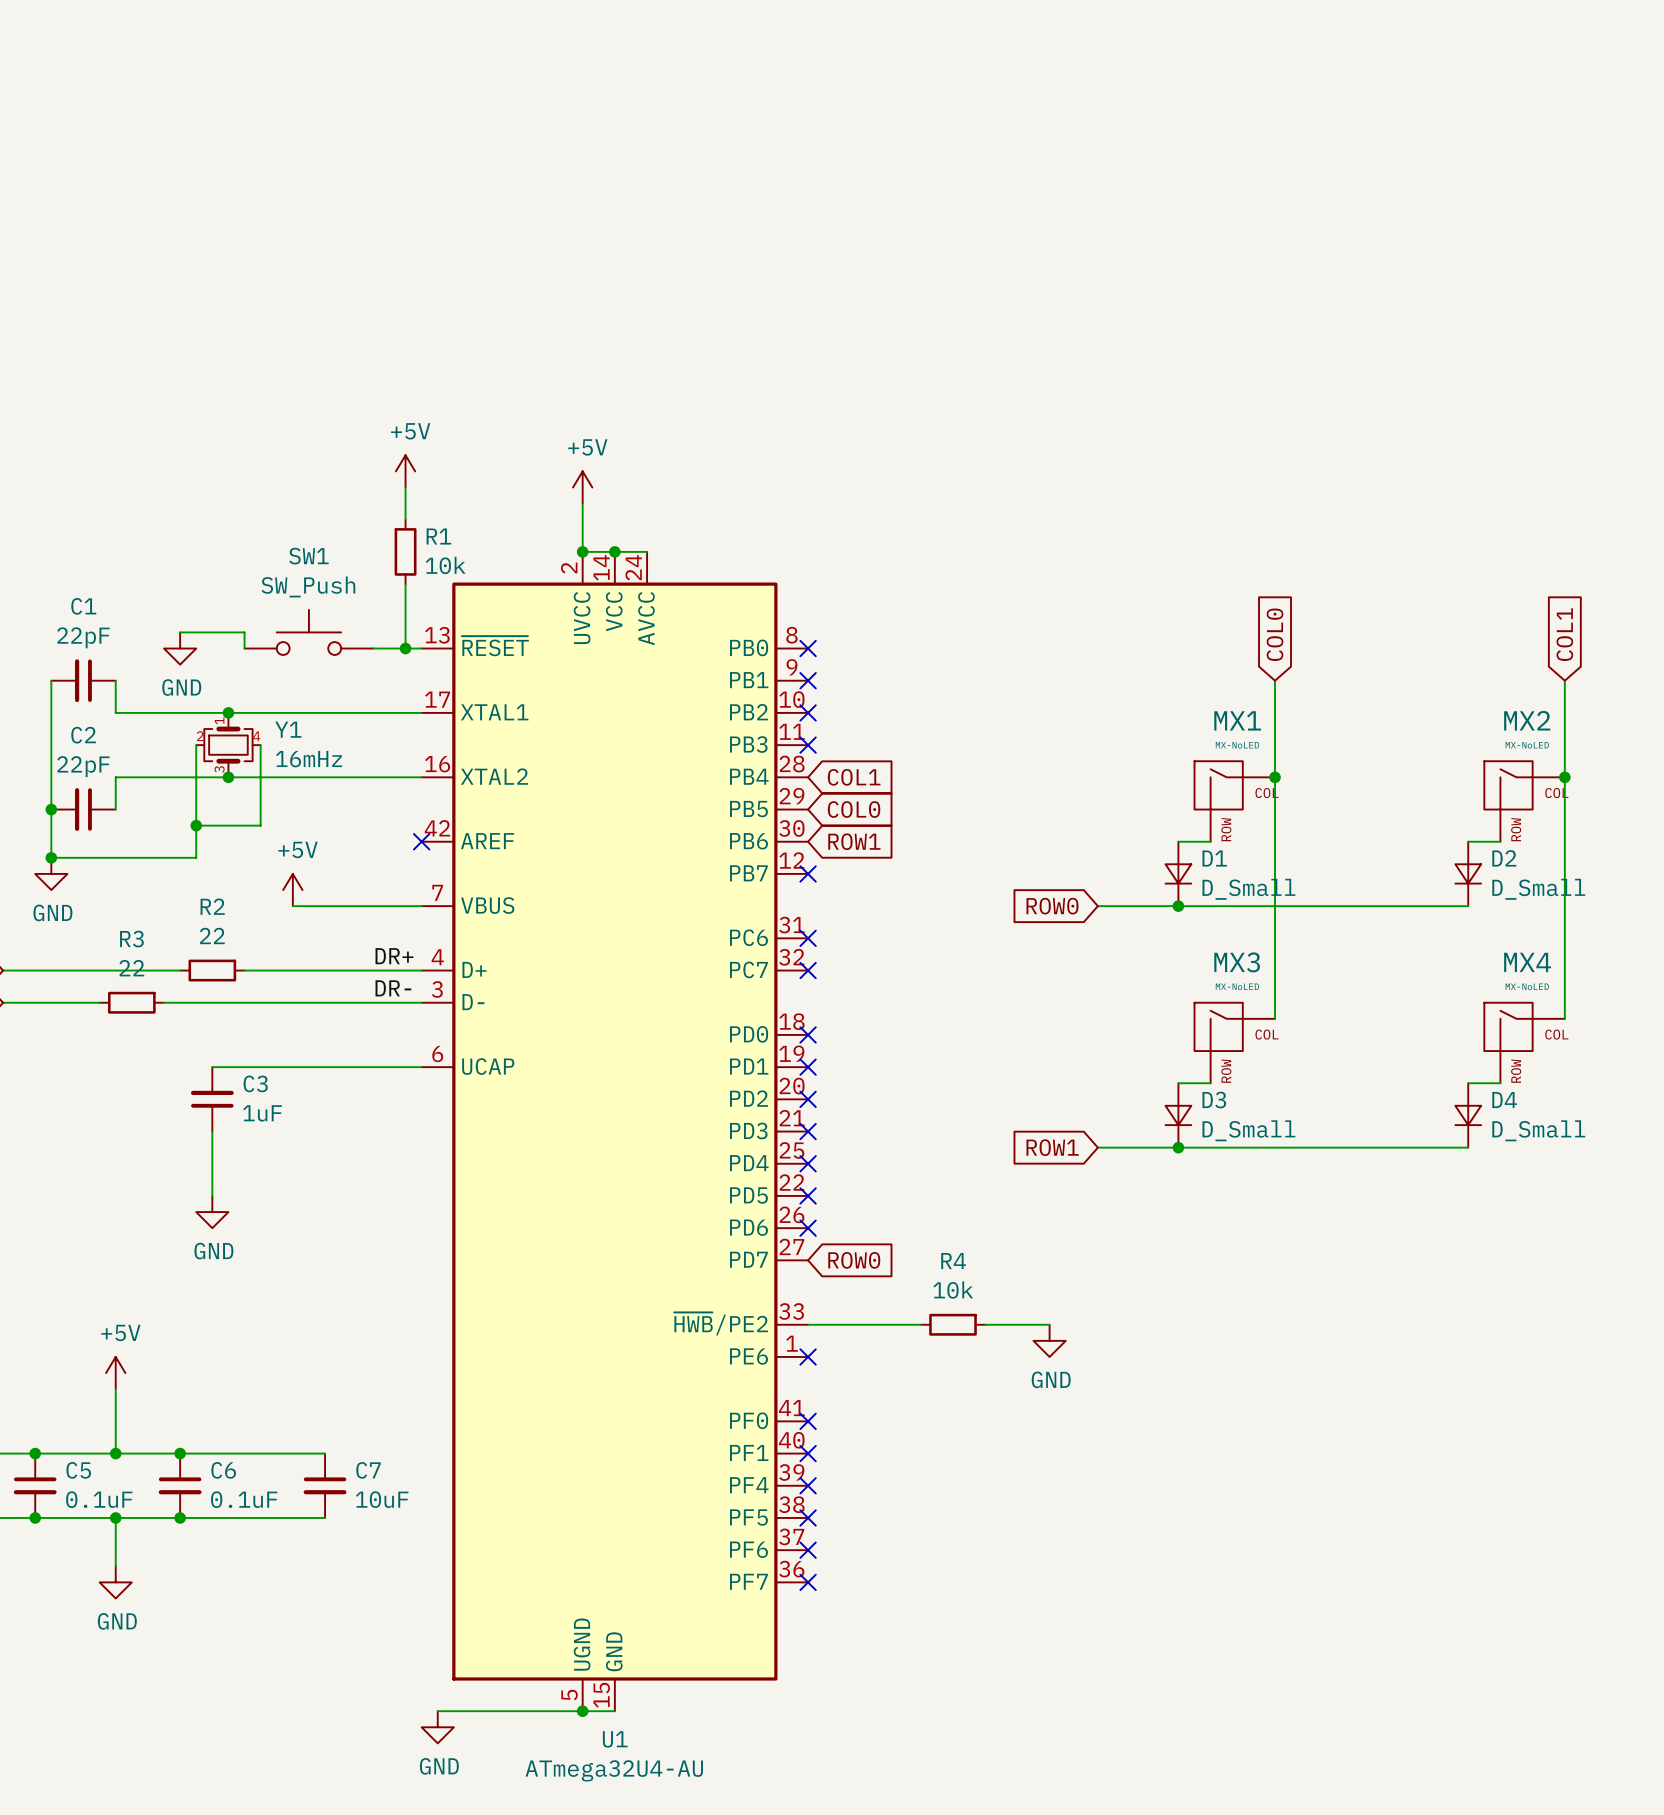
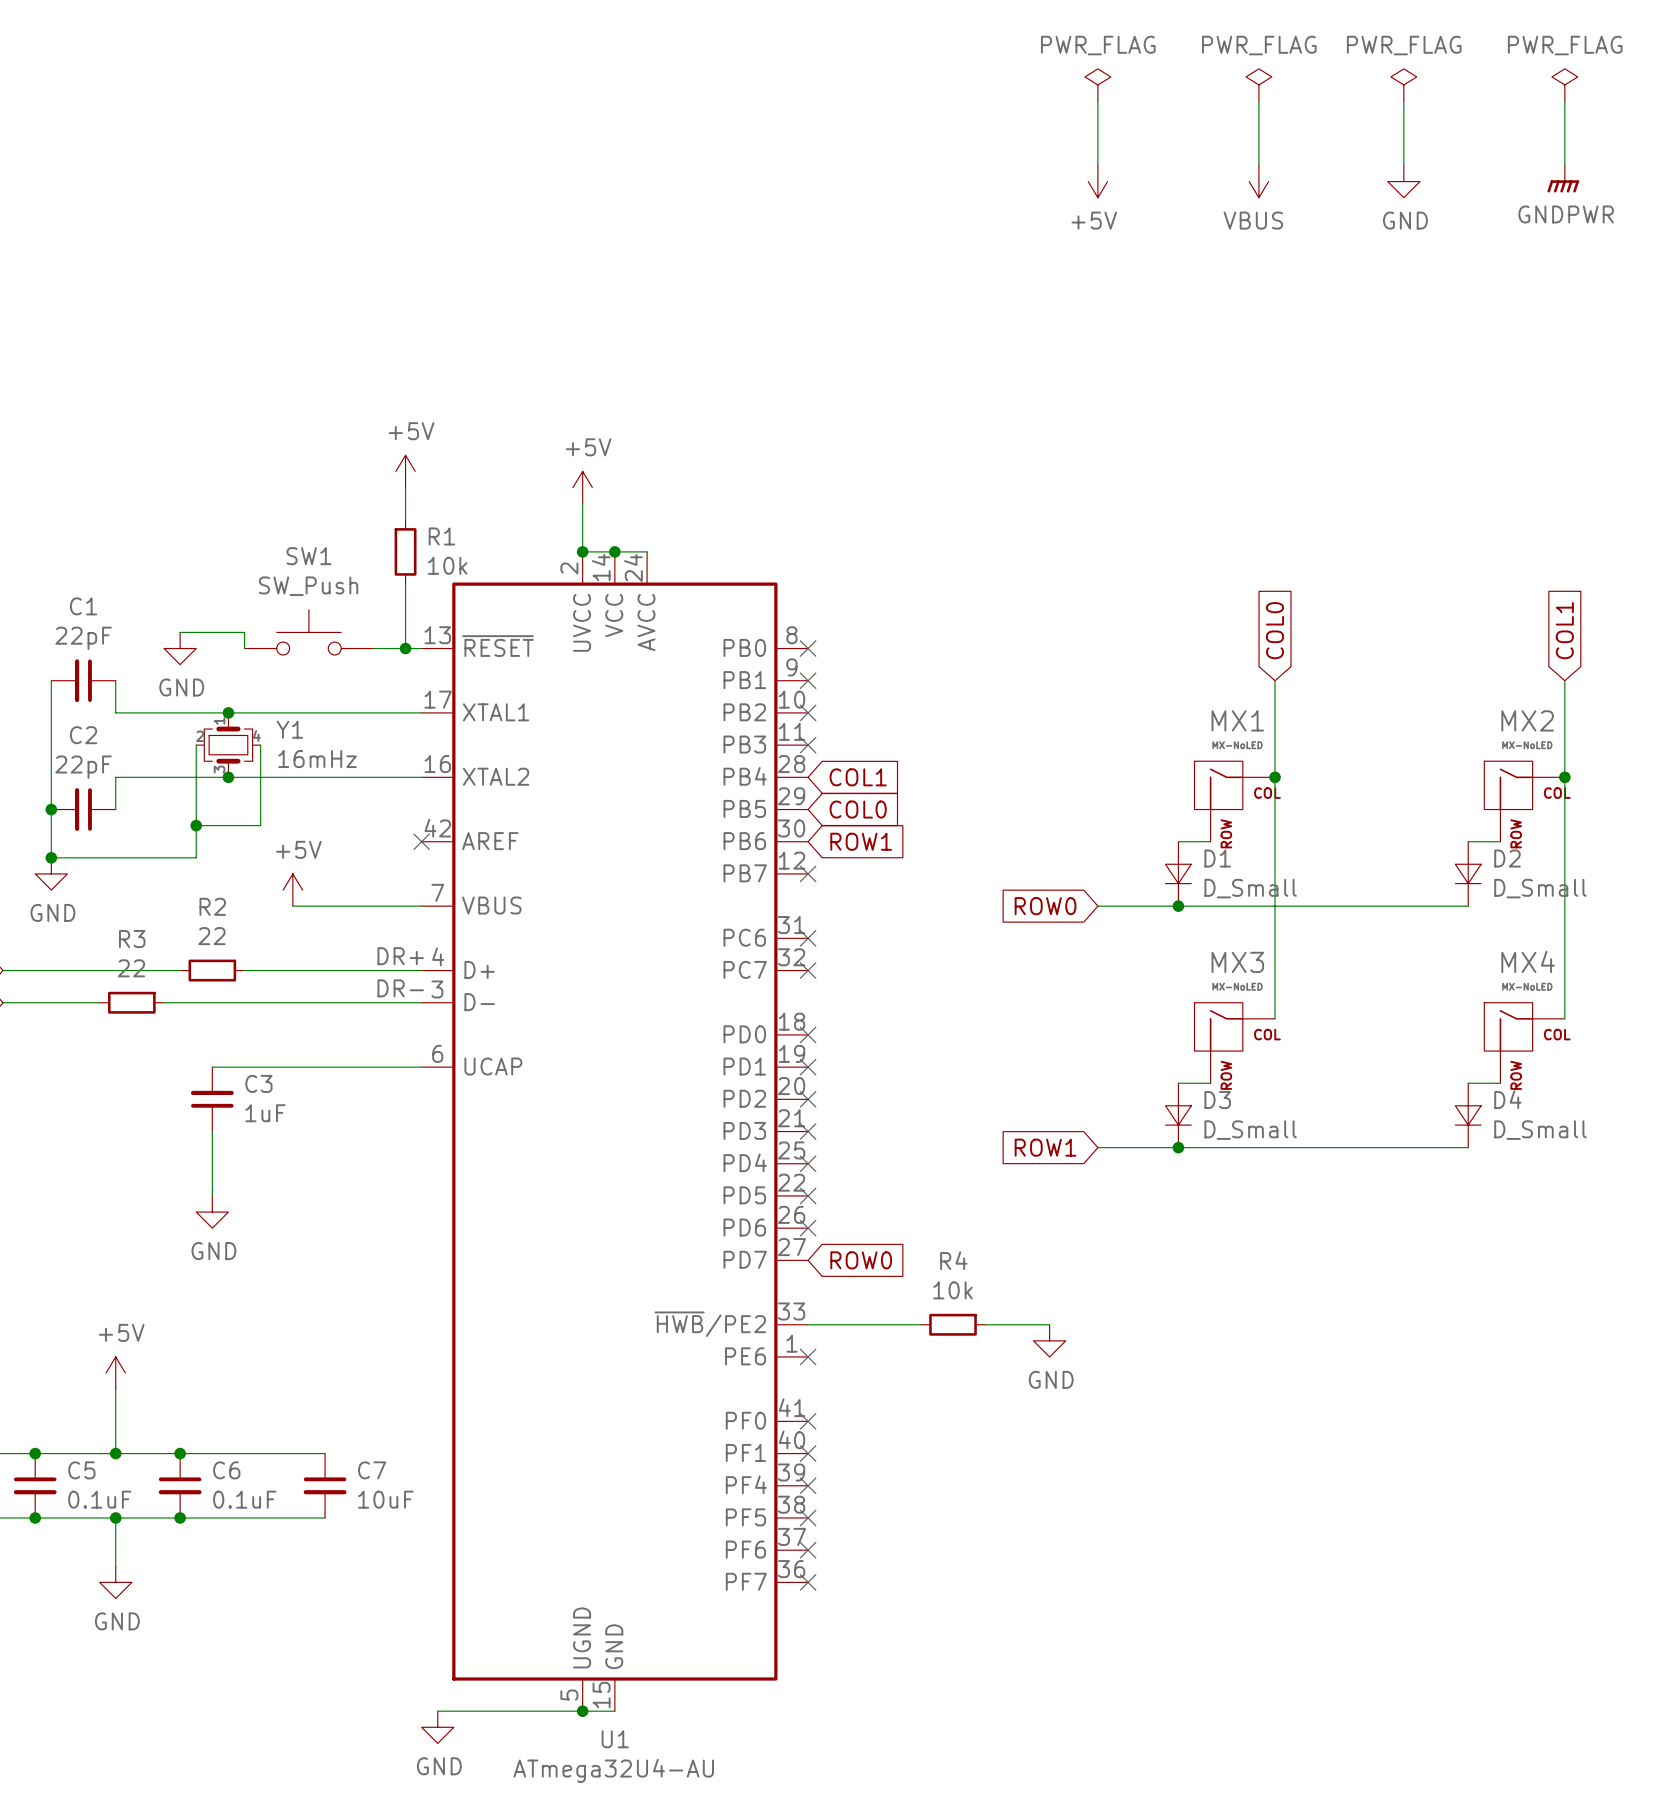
power symbol: none -> PWR_FLAG (1097, 84)
power symbol: none -> PWR_FLAG (1258, 84)
power symbol: none -> PWR_FLAG (1403, 84)
power symbol: none -> PWR_FLAG (1564, 84)
wire: none -> (1097, 101) (1097, 165)
wire: none -> (1258, 101) (1258, 165)
wire: none -> (1403, 101) (1403, 165)
wire: none -> (1564, 101) (1564, 165)
power symbol: none -> GNDPWR (1563, 179)
power symbol: none -> +5V (1097, 181)
power symbol: none -> VBUS (1258, 181)
power symbol: none -> GND (1403, 181)

